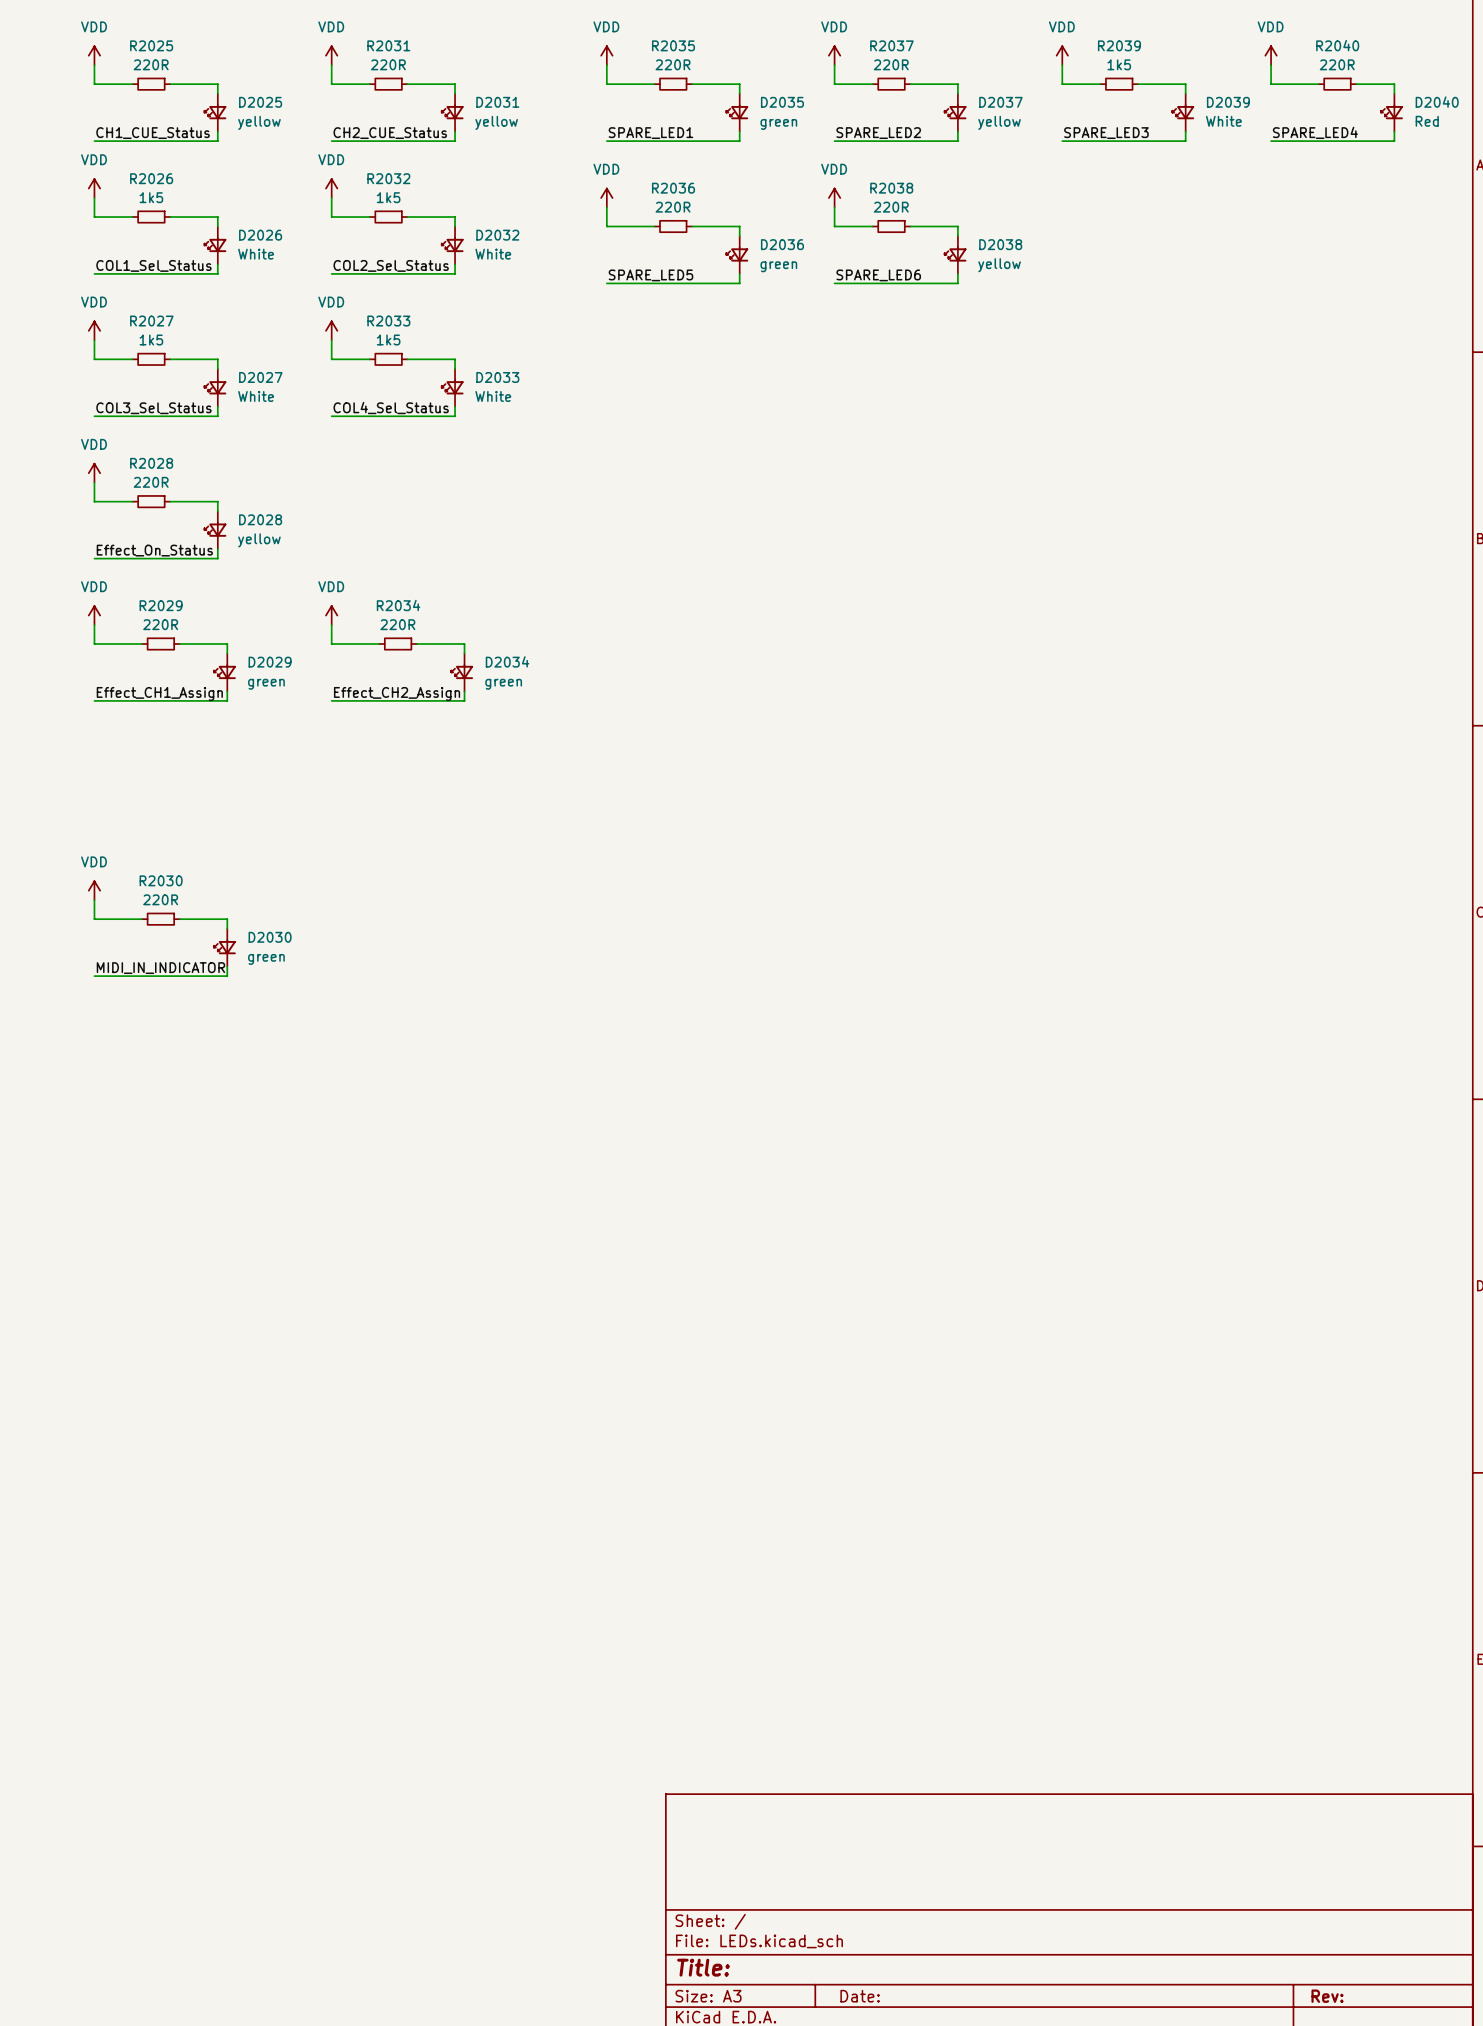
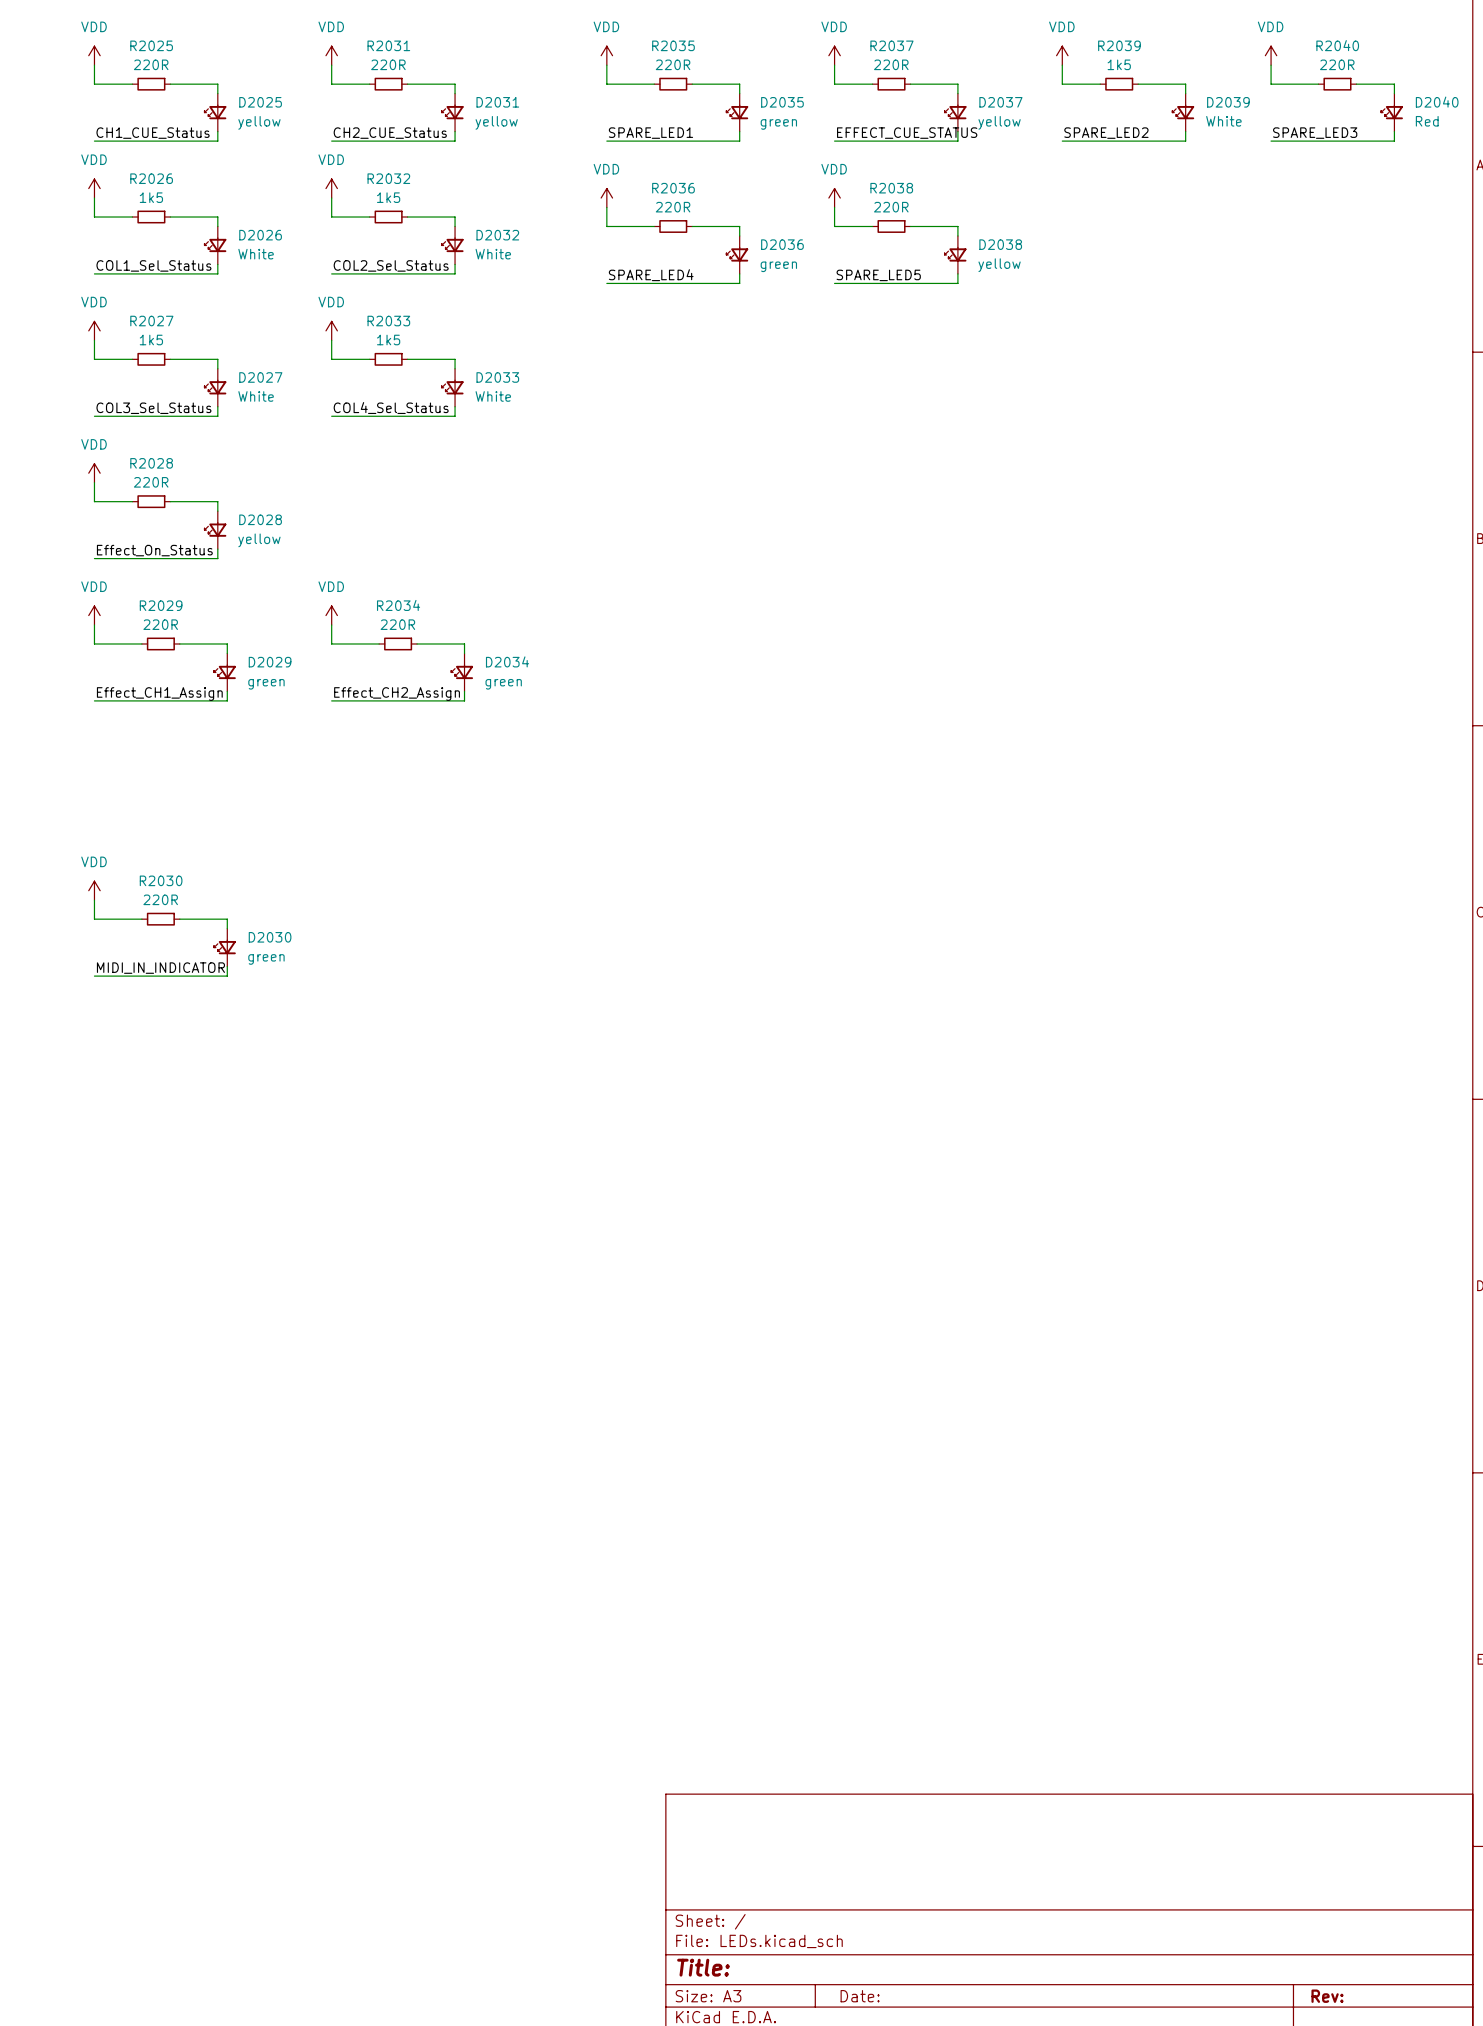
label: SPARE_LED4 (1315, 132) -> SPARE_LED3 (1315, 133)
label: SPARE_LED2 (878, 133) -> EFFECT_CUE_STATUS (907, 133)
label: SPARE_LED3 (1106, 133) -> SPARE_LED2 (1106, 133)
label: SPARE_LED5 (650, 275) -> SPARE_LED4 (651, 275)
label: SPARE_LED6 (878, 275) -> SPARE_LED5 (878, 275)

